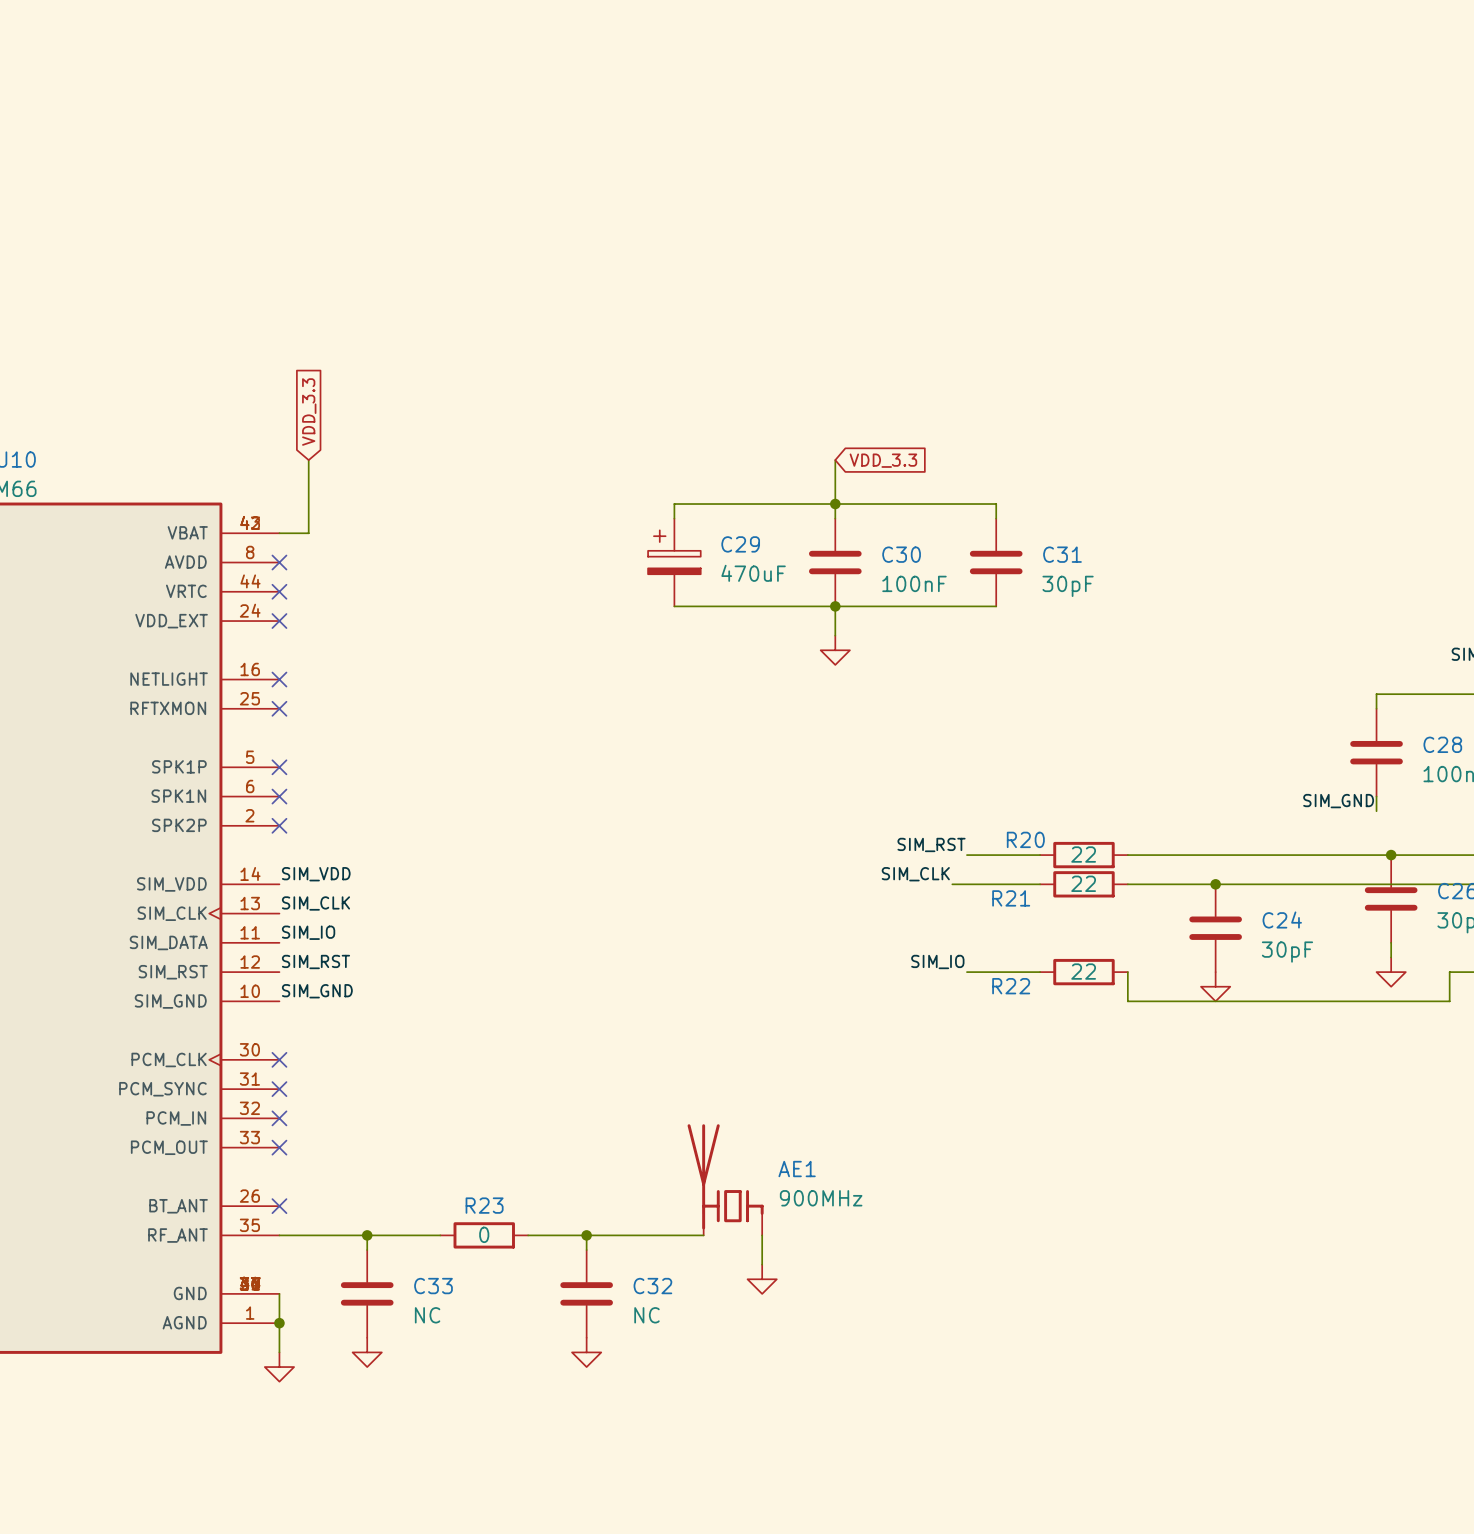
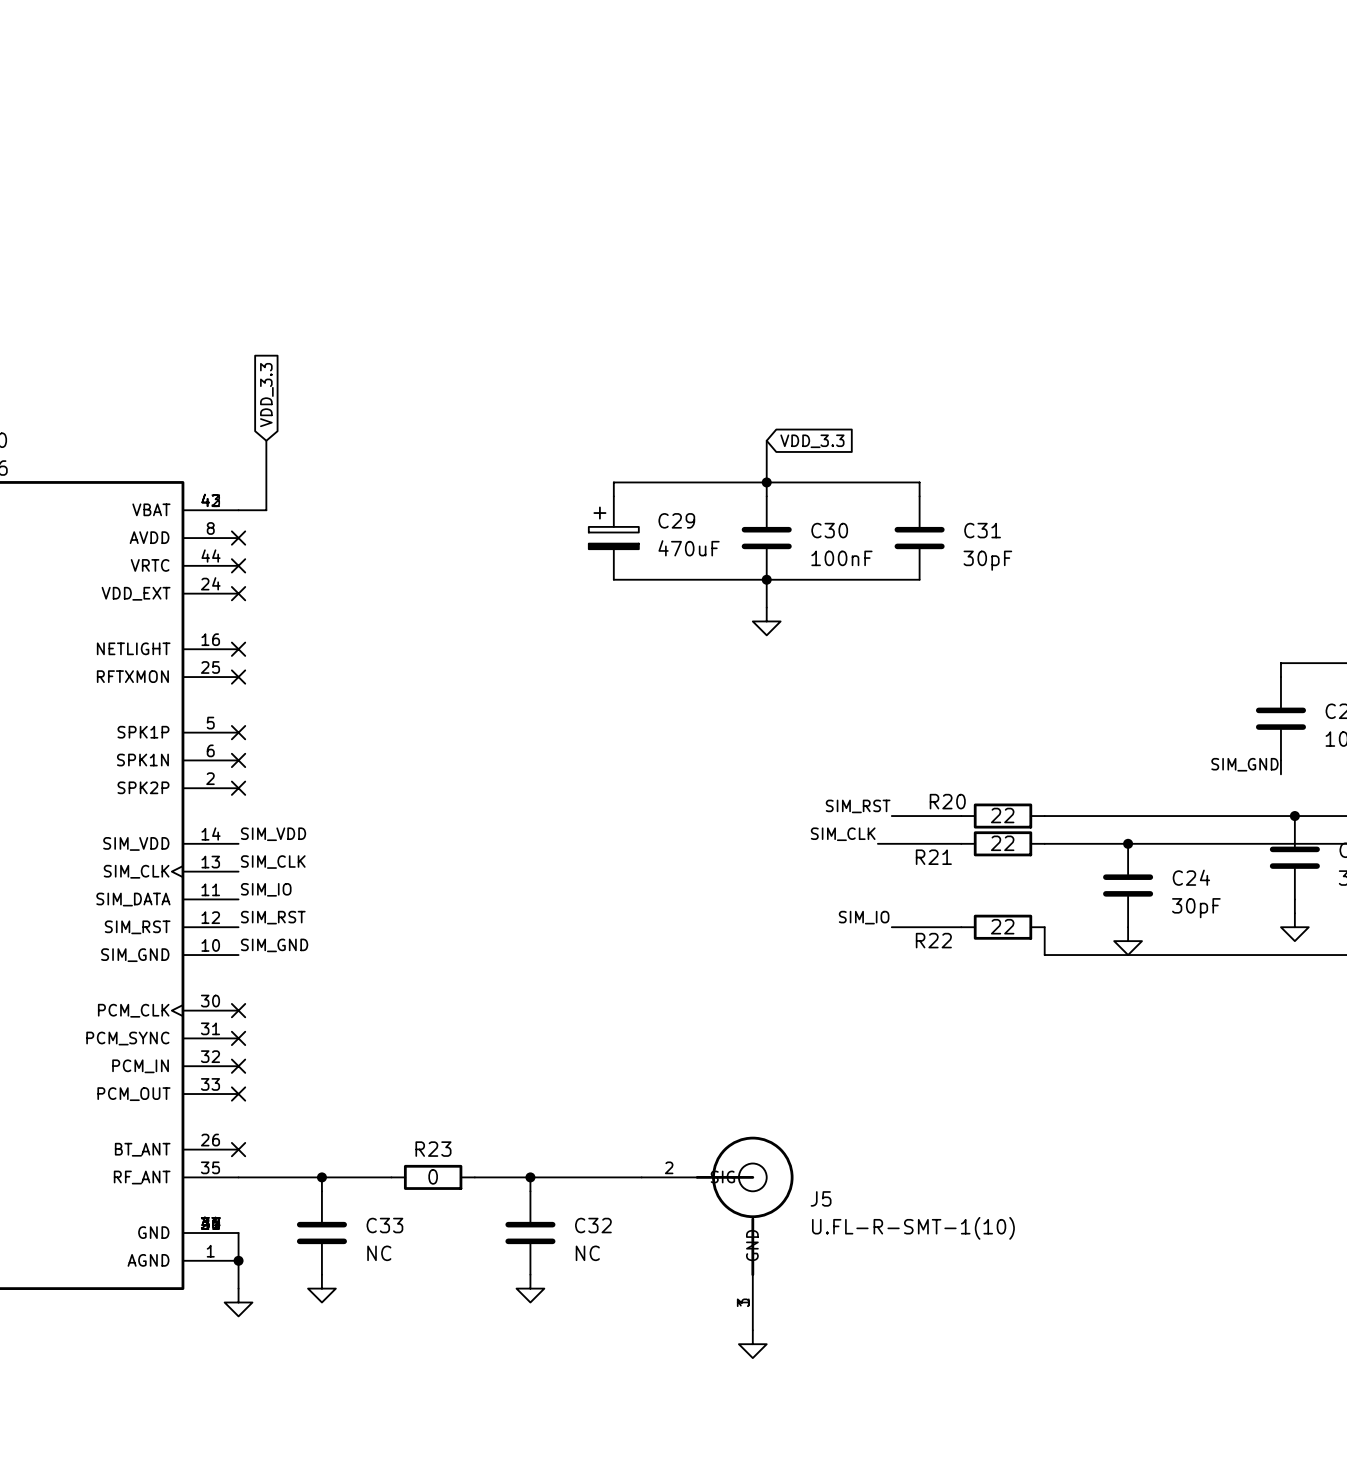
AE1: 900MHz (725, 1179) -> none
wire: (762, 1235) (762, 1264) -> none
power symbol position: (762, 1279) -> (752, 1344)
J5: none -> U.FL-R-SMT-1(10) (717, 1233)

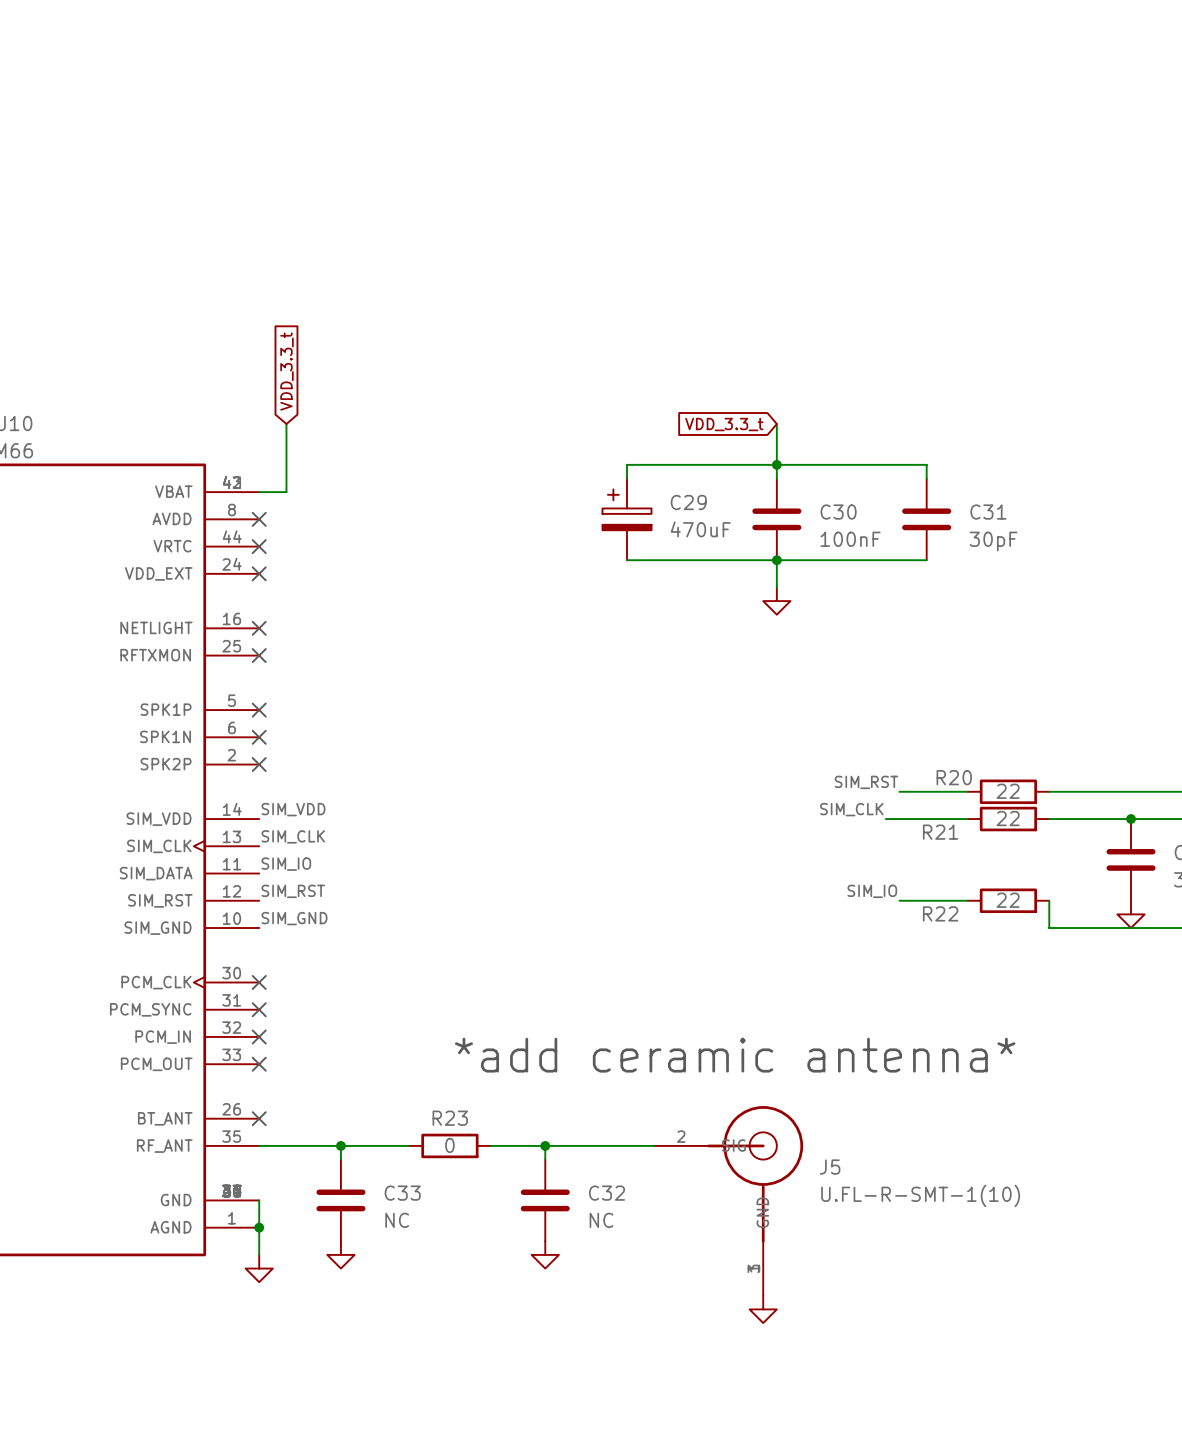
global label: VDD_3.3 (266, 395) -> VDD_3.3_t (286, 371)
global label: VDD_3.3 (812, 441) -> VDD_3.3_t (724, 424)
text: none -> *add ceramic antenna* (735, 1055)

